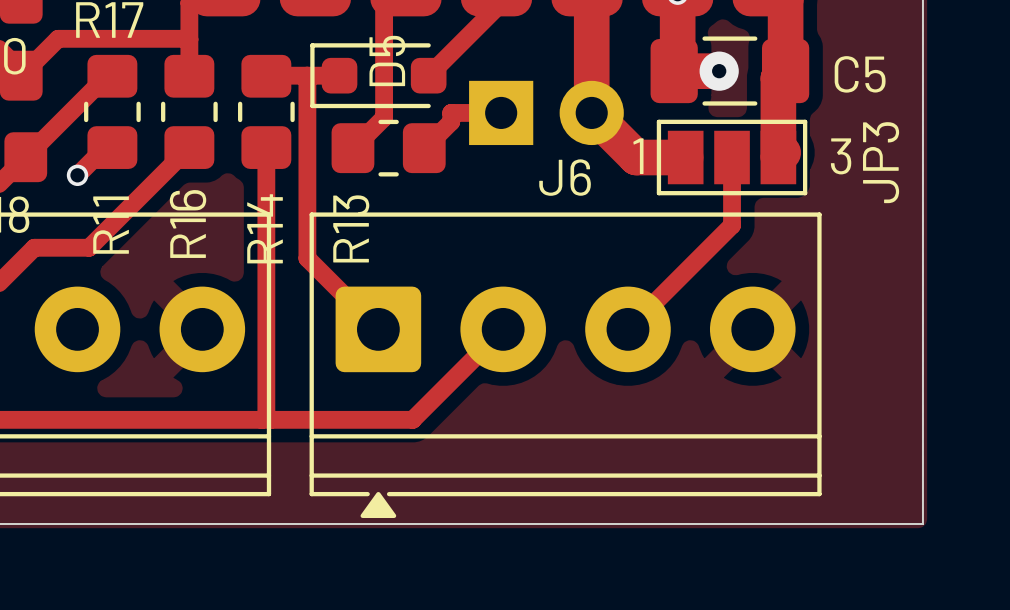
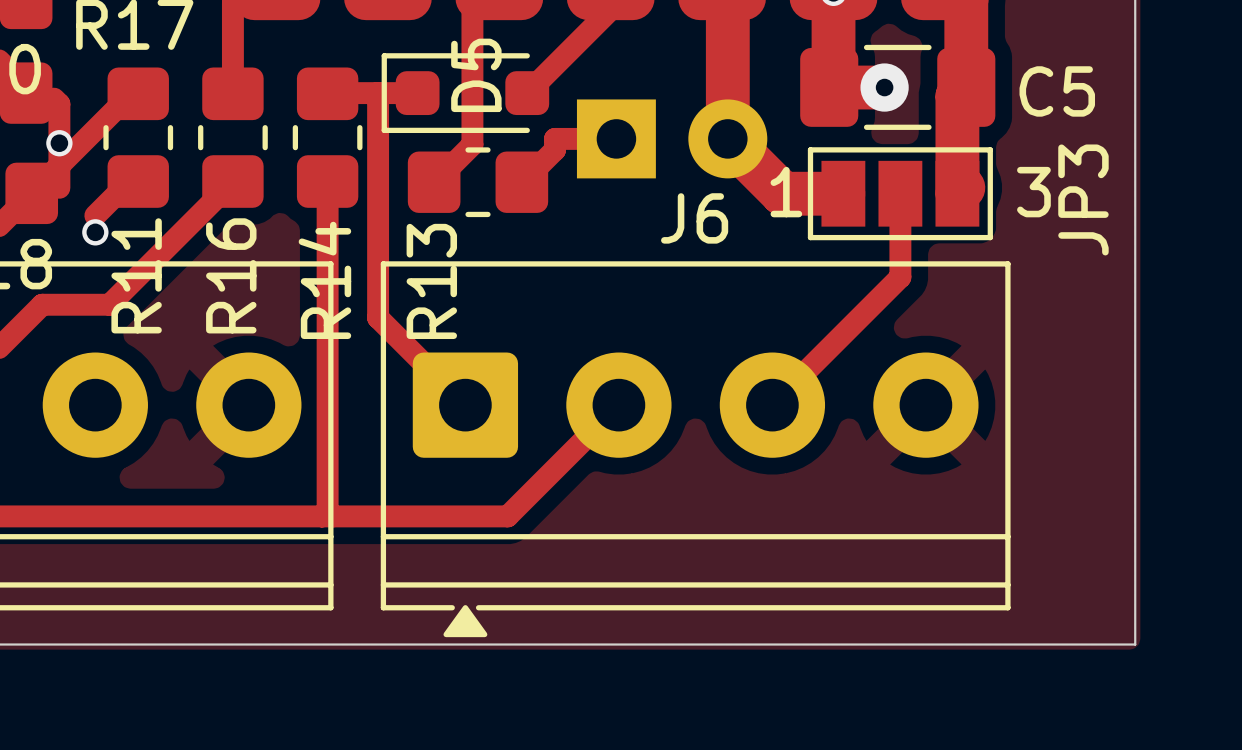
track: (189, 39) (58, 38) (21, 75) -> none
track: none -> (53, 98) (59, 104) (59, 187)
via: none -> (59, 143)
via position: (77, 175) -> (95, 232)

